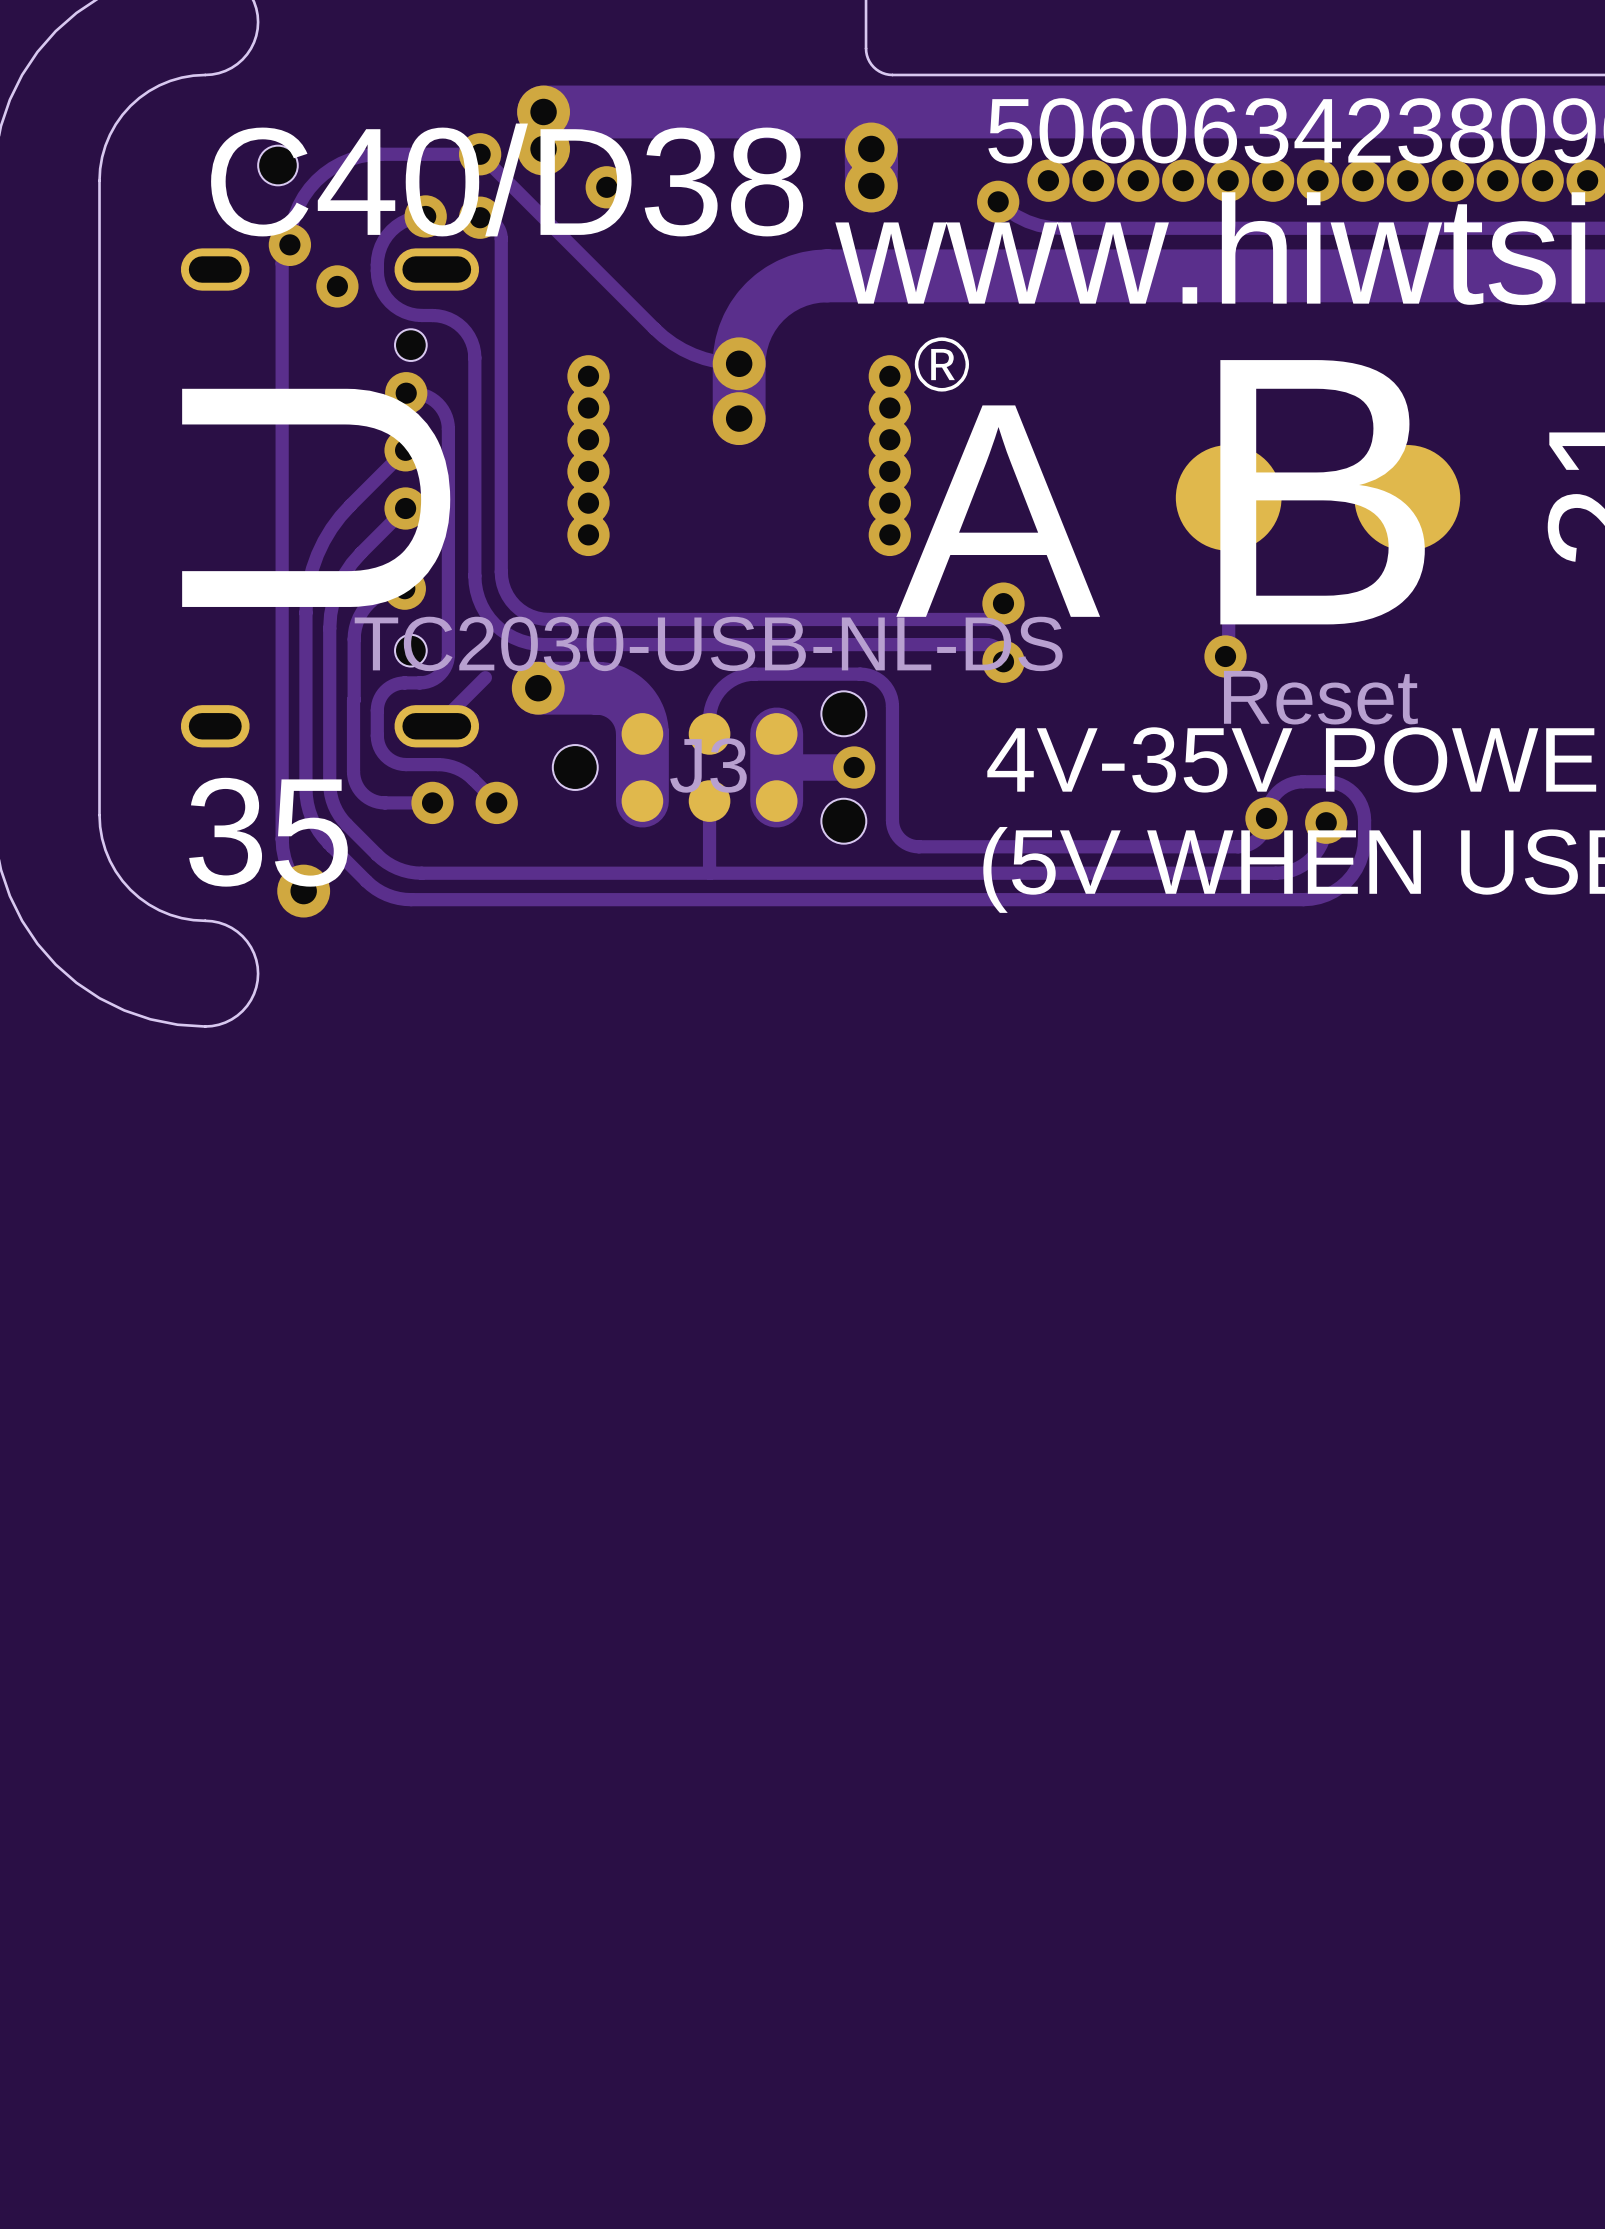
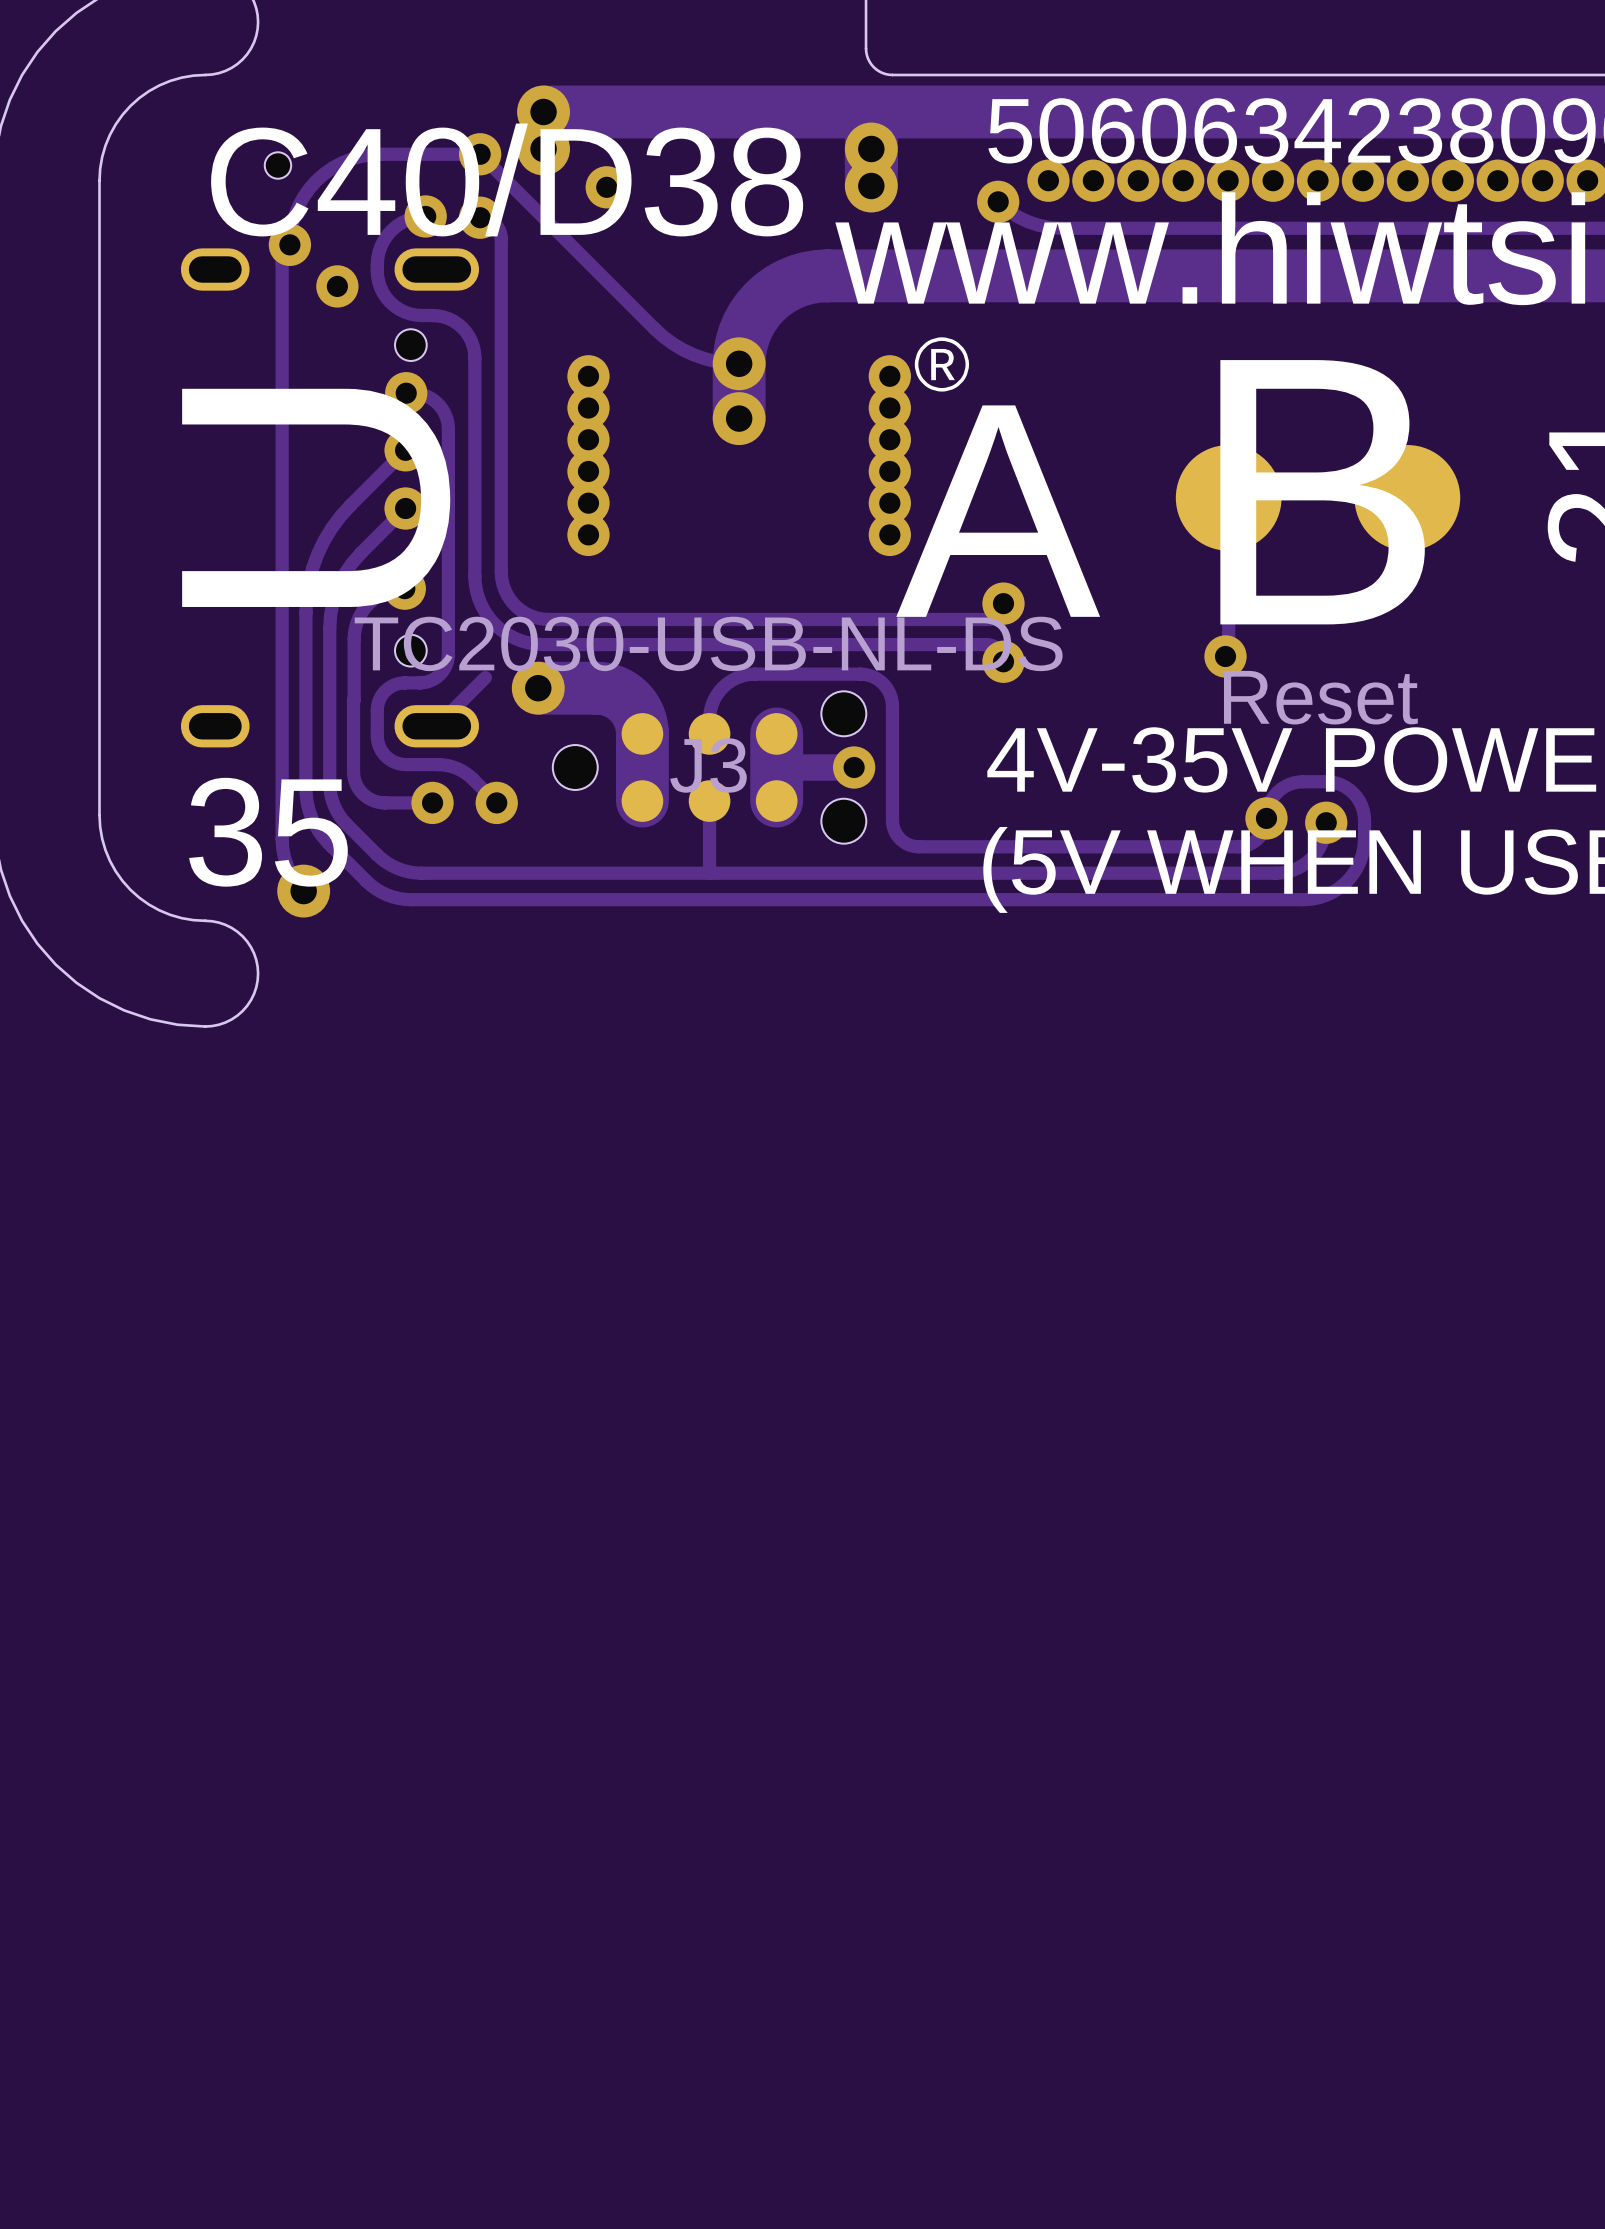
part footprint: [258, 145, 298, 186] -> [264, 152, 292, 179]

